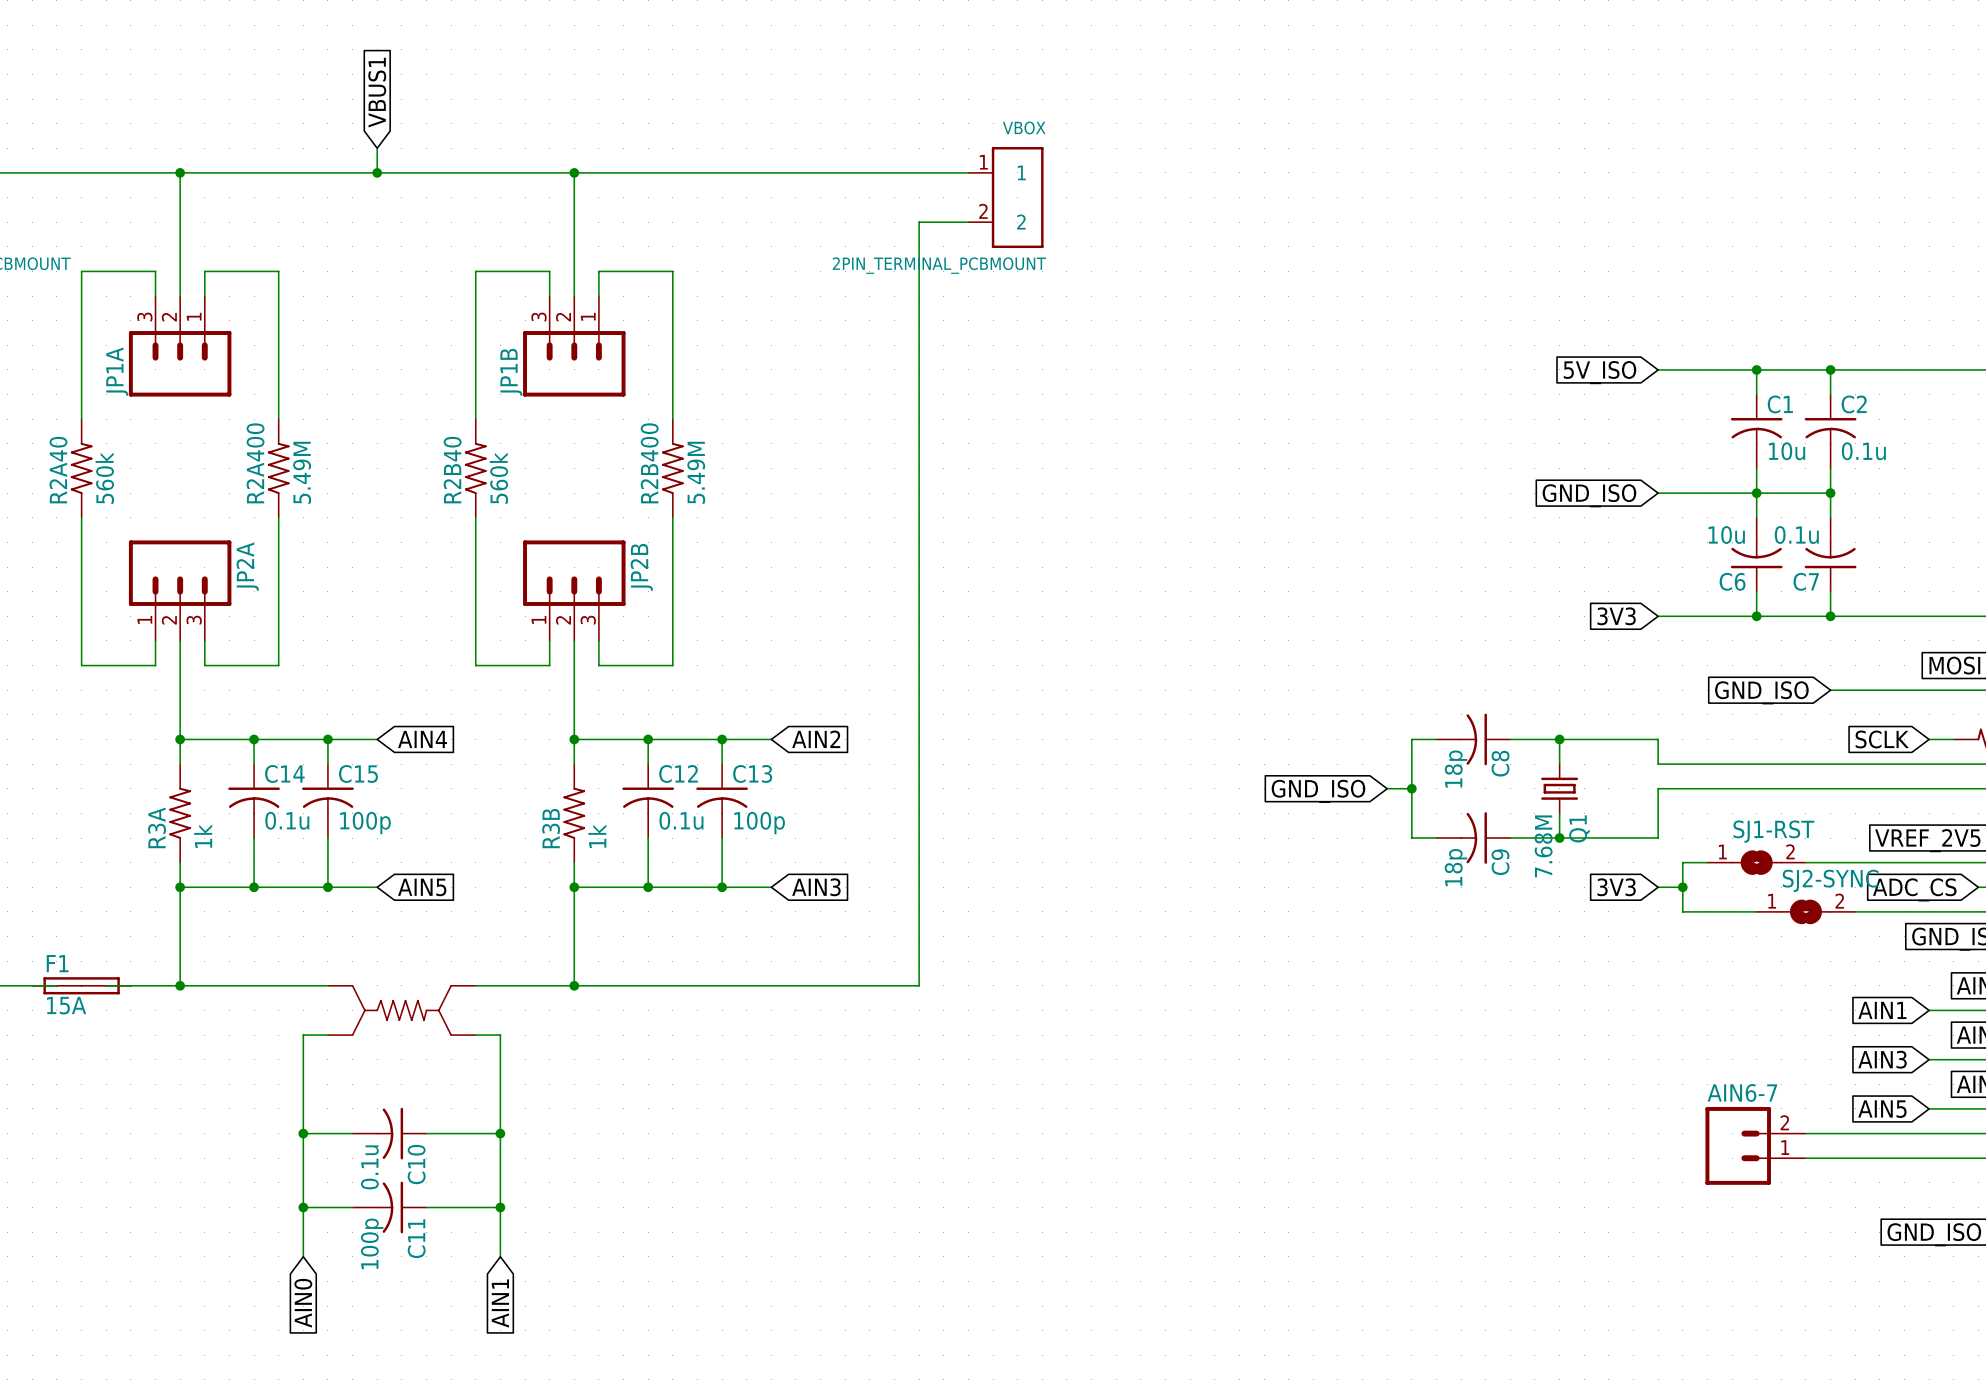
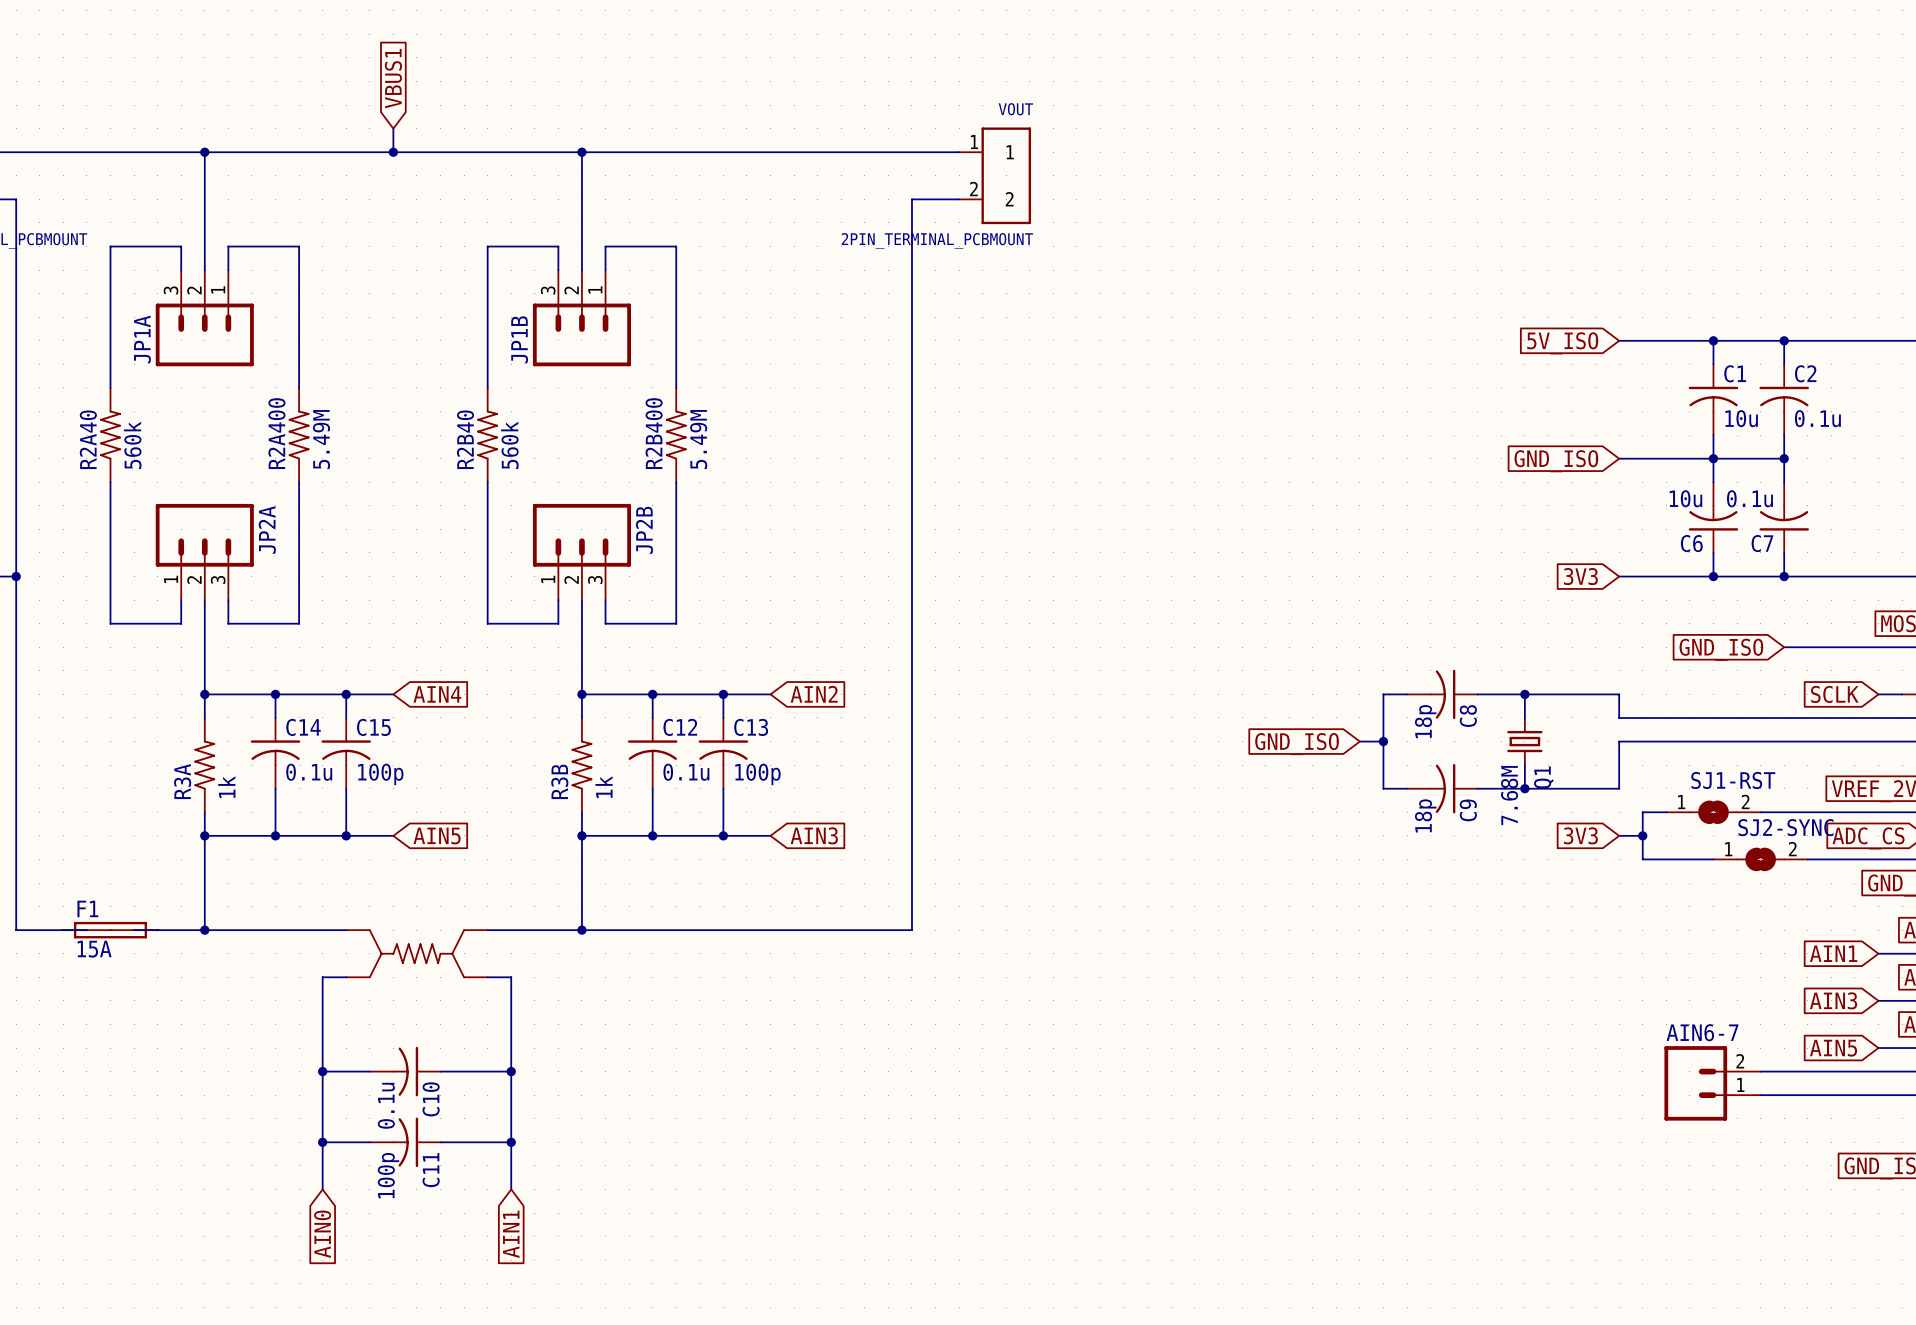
VBOX name: VBOX (1024, 127) -> VOUT (1015, 109)

